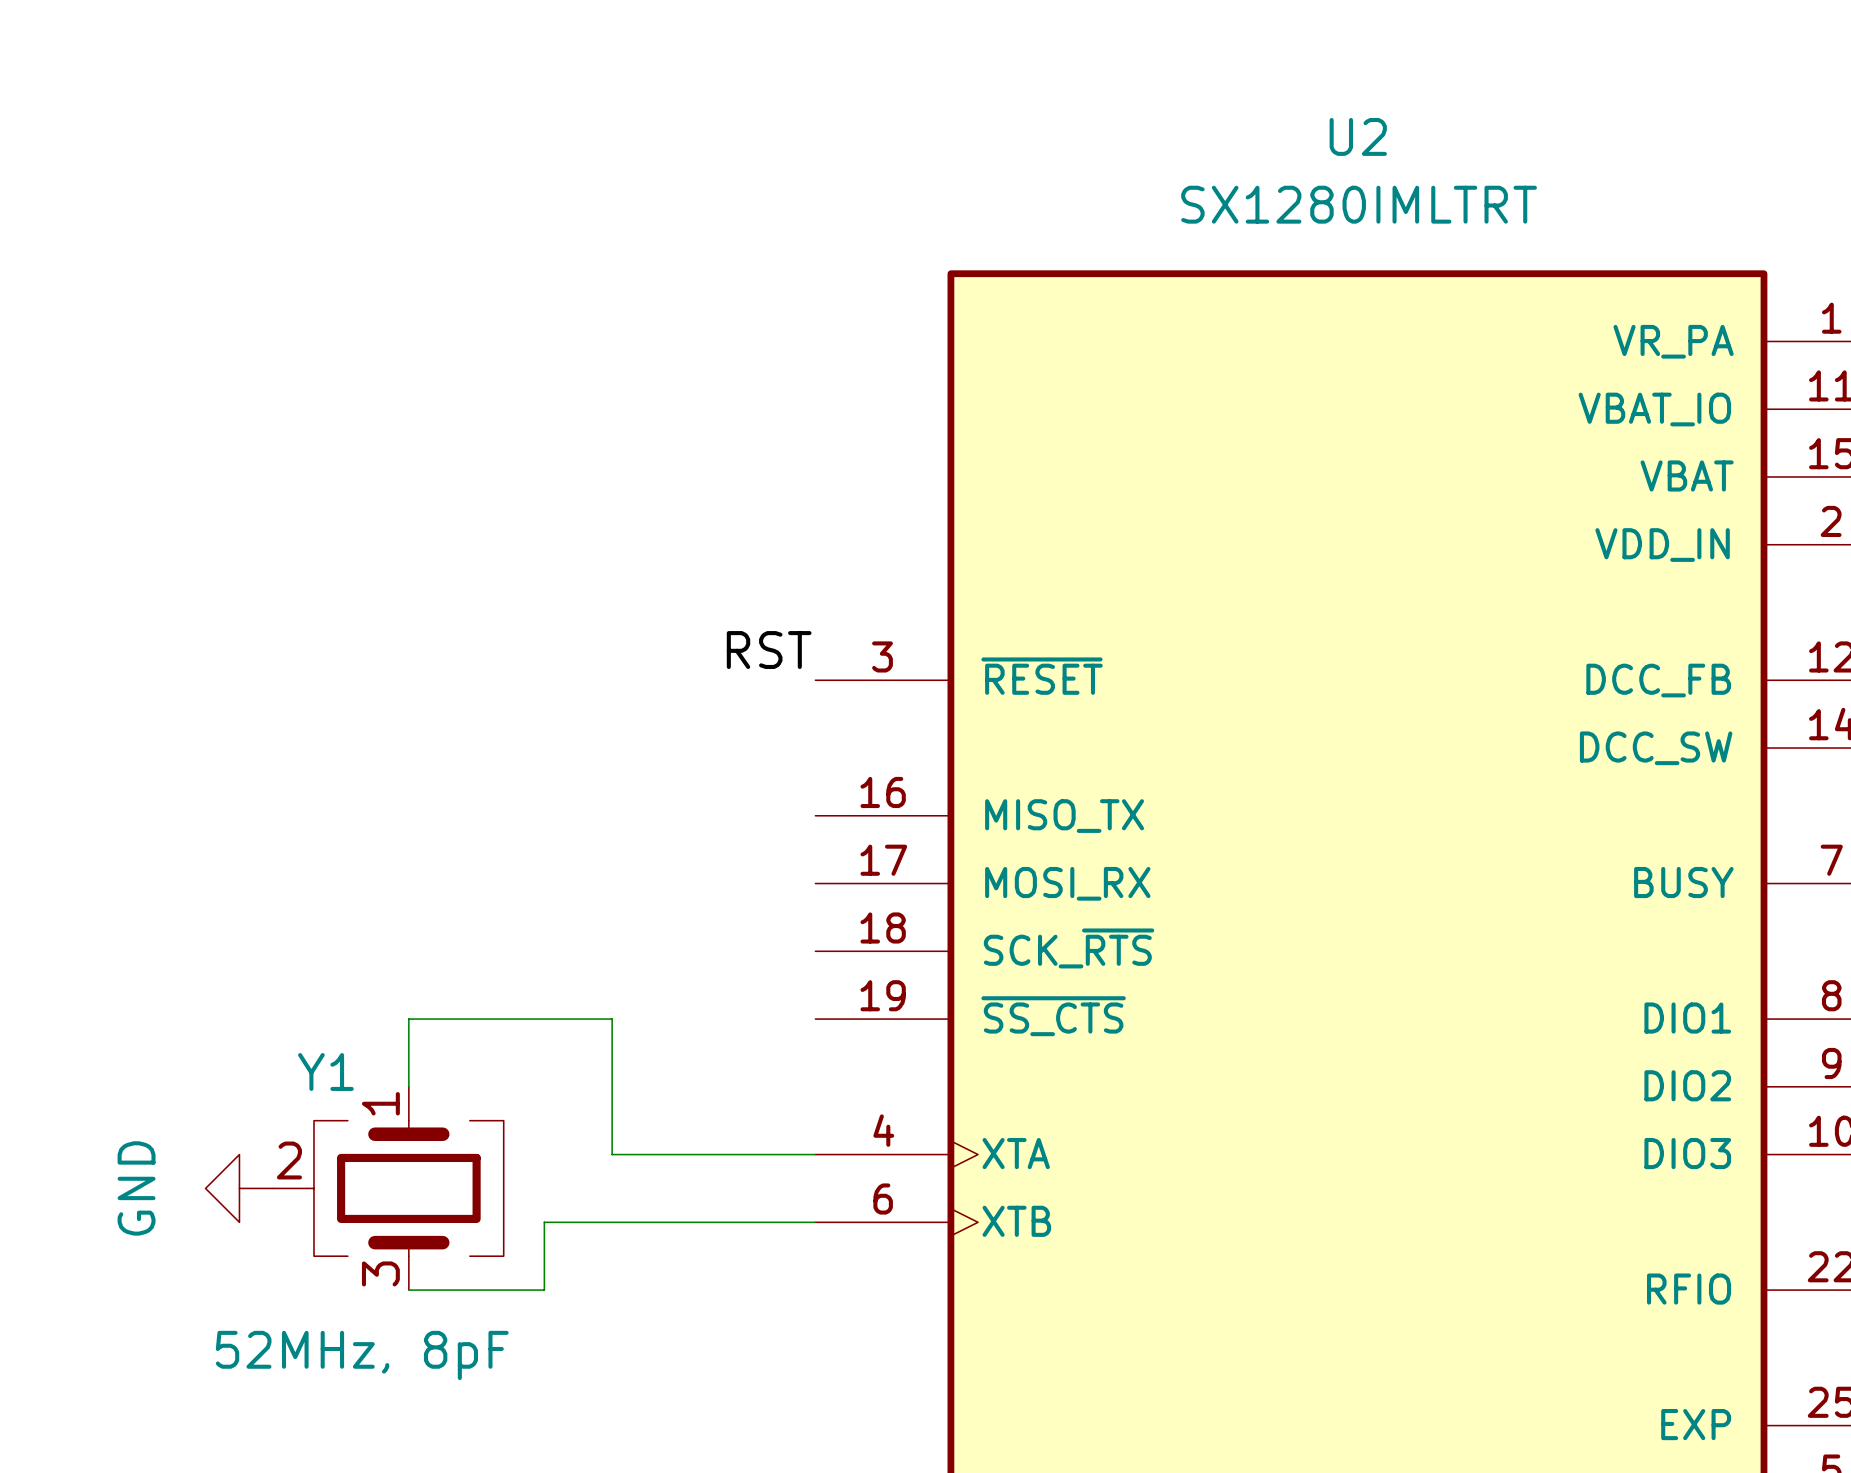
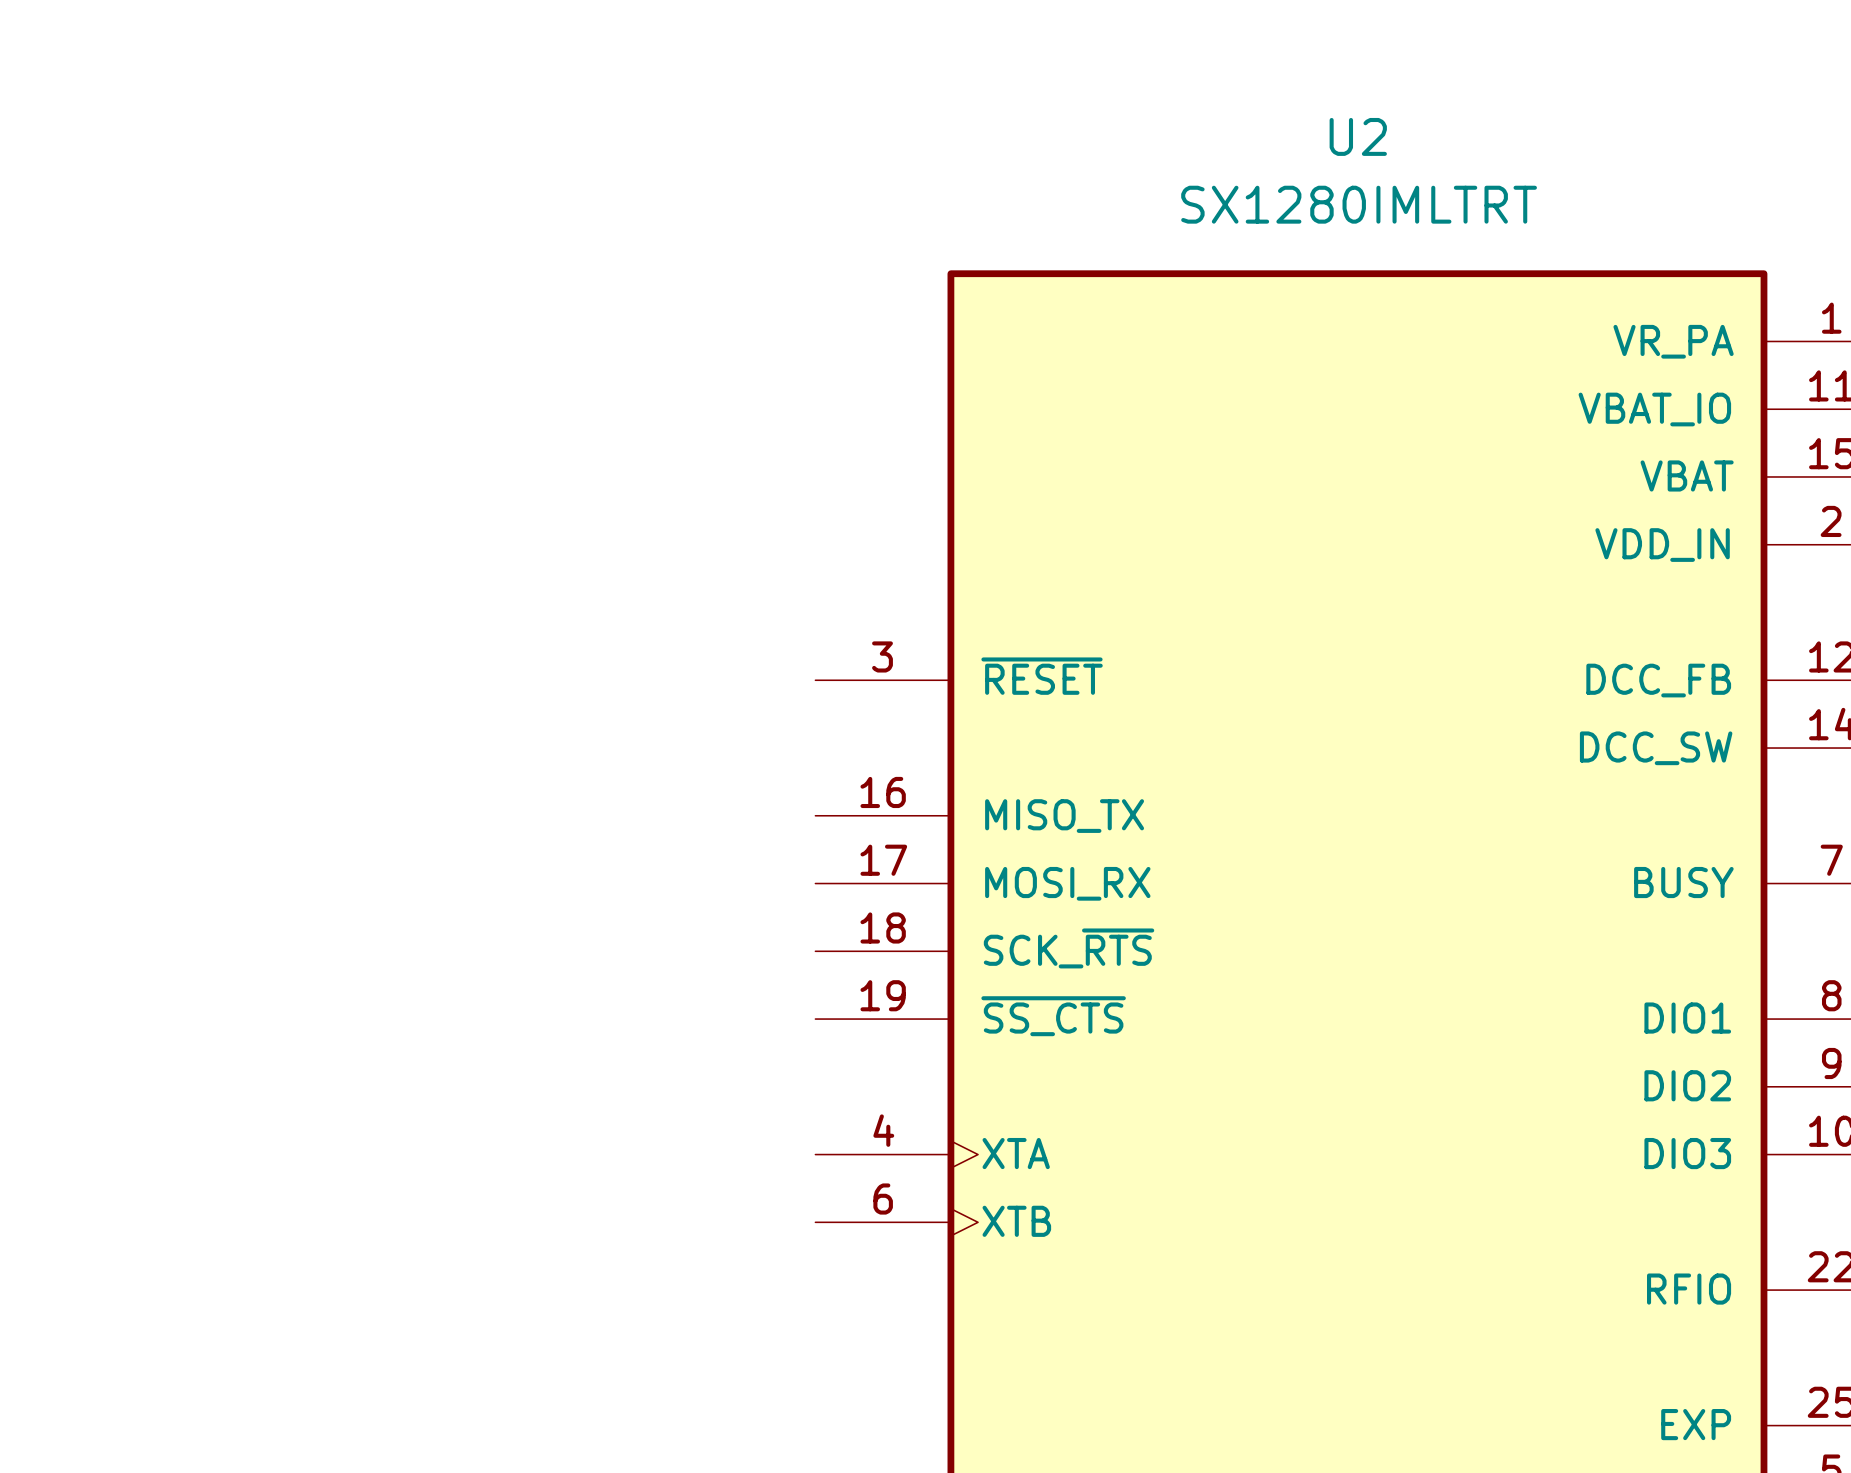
label: RST (769, 650) -> none
wire: (408, 1086) (408, 1019) (612, 1019) (612, 1154) (815, 1154) -> none
power symbol: GND (239, 1188) -> none
Y1: 52MHz, 8pF (388, 1188) -> none
wire: (815, 1222) (544, 1222) (544, 1290) (408, 1290) -> none

